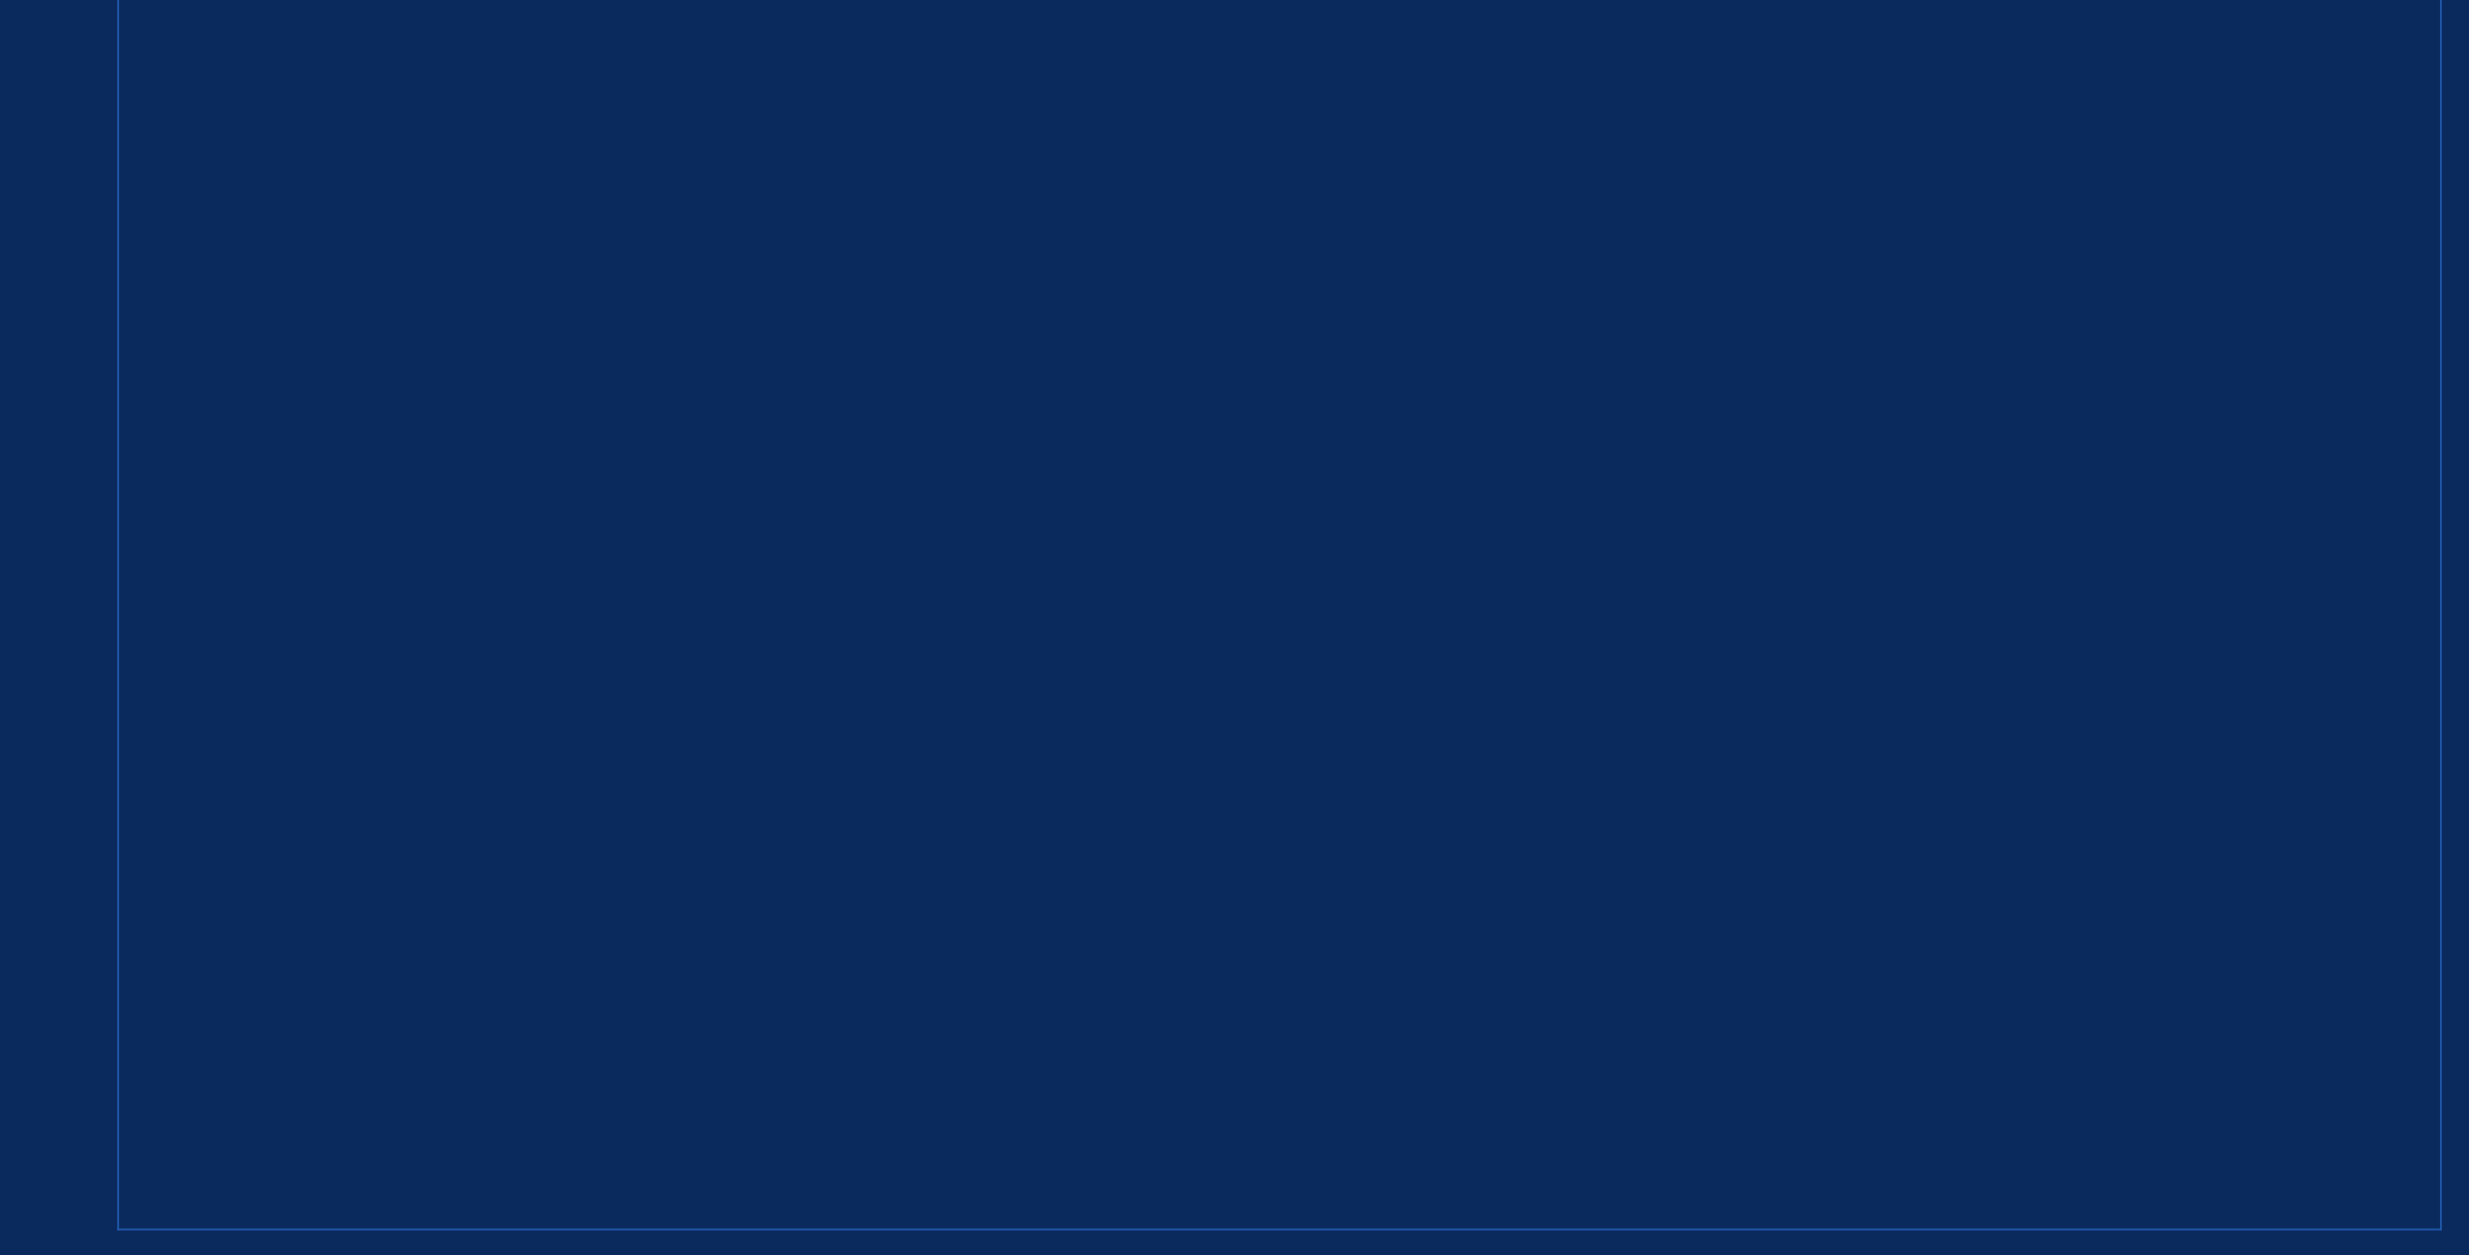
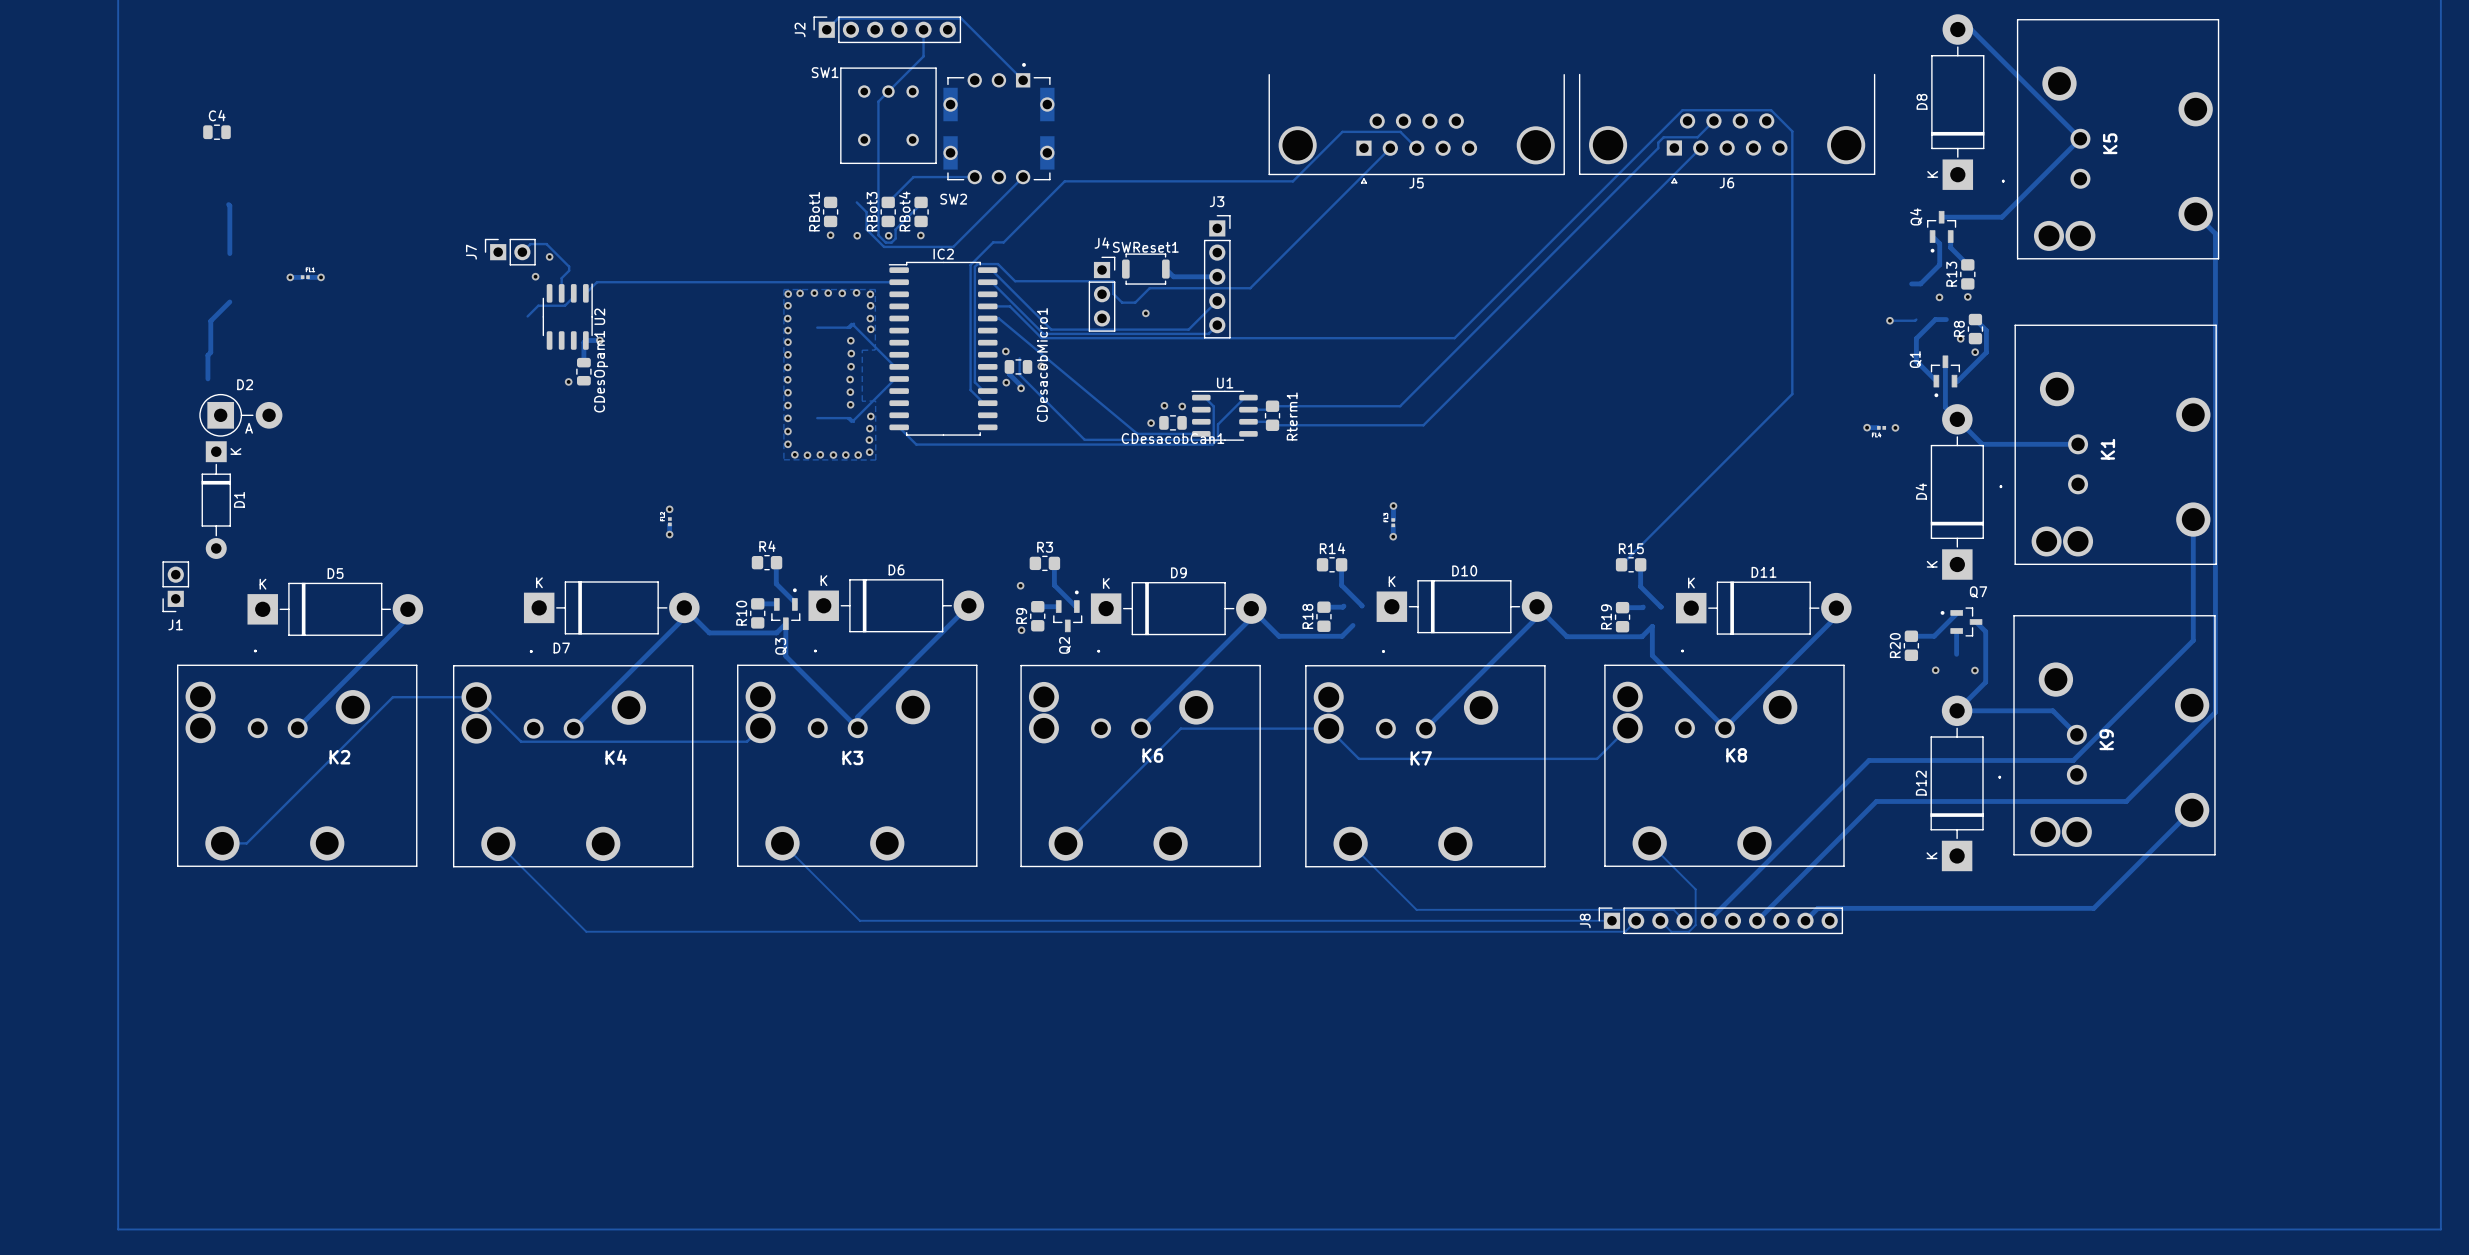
track: none -> (826, 29) (837, 18) (961, 18) (1023, 80)
J2: none -> (887, 29)
track: none -> (923, 29) (923, 56) (878, 101) (878, 235) (885, 242) (891, 242) (895, 238) (895, 229) (921, 202)
track: none -> (1957, 29) (1971, 29) (2080, 138) (2002, 217) (1941, 217)
D8: none -> (1957, 102)
SW1: none -> (888, 115)
track: none -> (1713, 120) (1697, 137) (1663, 137) (1658, 142) (1658, 148) (1400, 406) (1272, 406) (1269, 409) (1248, 409)
SW2: none -> (998, 123)
J5: none -> (1416, 128)
J6: none -> (1727, 128)
C4: none -> (216, 132)
K5: none -> (2110, 139)
track: none -> (1390, 148) (1250, 288) (1149, 288) (1135, 302) (1122, 302) (1113, 293) (1113, 281) (1015, 281) (997, 264) (977, 264) (974, 266) (974, 382) (983, 391) (987, 391)
track: none -> (1416, 148) (1400, 131) (1342, 131) (1292, 181) (1064, 181) (1003, 242) (993, 242) (970, 265) (970, 390) (983, 403) (987, 403)
track: none -> (1700, 148) (1423, 425) (1272, 425) (1269, 421) (1248, 421)
track: none -> (974, 177) (913, 177) (888, 202)
track: none -> (1023, 177) (953, 246) (884, 246) (866, 229) (866, 212) (856, 202)
track: none -> (228, 204) (229, 253)
RBot1: none -> (830, 211)
RBot3: none -> (888, 211)
RBot4: none -> (921, 211)
track: none -> (2195, 214) (2215, 233) (2215, 712) (2126, 801) (1876, 801) (1757, 920)
Q4: none -> (1941, 231)
via: none -> (830, 235)
via: none -> (857, 235)
via: none -> (888, 235)
via: none -> (920, 235)
track: none -> (1932, 236) (1939, 243) (1939, 264) (1920, 283) (1911, 283)
track: none -> (1950, 236) (1950, 247) (1967, 264)
J7: none -> (510, 252)
track: none -> (522, 252) (530, 244) (546, 244) (569, 266) (569, 270) (561, 278) (561, 293)
via: none -> (549, 256)
SWReset1: none -> (1145, 269)
track: none -> (1165, 269) (1173, 276) (1217, 276)
track: none -> (987, 270) (991, 270) (1051, 329) (1188, 329) (1217, 300)
R13: none -> (1967, 274)
via: none -> (535, 276)
J3: none -> (1217, 276)
via: none -> (290, 277)
track: none -> (301, 277) (290, 277)
part: none -> (305, 277)
track: none -> (308, 277) (321, 277)
via: none -> (321, 277)
track: none -> (899, 282) (597, 282) (585, 293)
track: none -> (987, 282) (991, 282) (1043, 333) (1208, 333) (1217, 325)
zone outline: none -> (783, 289) (783, 459) (875, 460) (875, 400) (862, 401) (862, 350) (875, 350) (875, 289) (783, 289)
via: none -> (856, 292)
track: none -> (573, 293) (573, 296) (564, 305) (538, 305) (527, 316)
via: none -> (800, 293)
via: none -> (814, 293)
via: none -> (828, 293)
via: none -> (842, 293)
via: none -> (788, 294)
via: none -> (870, 294)
J4: none -> (1102, 294)
via: none -> (1967, 296)
via: none -> (1939, 297)
track: none -> (229, 301) (210, 321) (210, 352) (207, 355) (207, 378)
via: none -> (787, 305)
via: none -> (870, 305)
track: none -> (987, 306) (1009, 306) (1041, 338) (1454, 338) (1682, 110) (1771, 110) (1792, 131) (1792, 394) (1621, 564)
via: none -> (1145, 313)
U2: none -> (567, 316)
via: none -> (787, 318)
via: none -> (870, 318)
track: none -> (987, 318) (998, 318) (1137, 433) (1201, 433)
track: none -> (1916, 319) (1889, 320)
track: none -> (1946, 319) (1935, 319) (1916, 338) (1916, 361) (1936, 381)
track: none -> (1975, 319) (1986, 330) (1986, 352) (1957, 381) (1954, 381)
via: none -> (1889, 320)
track: none -> (851, 323) (847, 327)
track: none -> (817, 327) (850, 327) (853, 323) (895, 366)
via: none -> (870, 329)
R8: none -> (1975, 329)
via: none -> (787, 330)
via: none -> (1960, 338)
track: none -> (599, 340) (585, 340) (583, 342) (583, 362)
via: none -> (599, 340)
via: none -> (850, 340)
via: none -> (787, 342)
IC2: none -> (943, 348)
via: none -> (1005, 351)
via: none -> (1975, 352)
via: none -> (851, 353)
via: none -> (787, 354)
track: none -> (1019, 358) (1019, 374) (1084, 439) (1211, 439) (1213, 437) (1213, 406) (1204, 397) (1201, 397)
track: none -> (1945, 361) (1945, 407) (1982, 444) (2078, 444)
via: none -> (851, 366)
track: none -> (1009, 366) (1009, 374) (1021, 385) (1021, 388)
CDesacobMicro1: none -> (1018, 366)
via: none -> (1041, 366)
via: none -> (787, 367)
CDesOpam1: none -> (583, 371)
Q1: none -> (1945, 376)
track: none -> (895, 378) (853, 421) (850, 418) (817, 418)
via: none -> (787, 379)
via: none -> (850, 379)
via: none -> (568, 381)
via: none -> (1006, 382)
via: none -> (1021, 388)
via: none -> (787, 392)
via: none -> (850, 392)
track: none -> (1248, 397) (1244, 397) (1218, 424) (1218, 439) (1212, 444) (916, 444) (899, 427)
via: none -> (850, 404)
via: none -> (787, 405)
via: none -> (1164, 405)
via: none -> (1182, 406)
D2: none -> (240, 415)
U1: none -> (1224, 415)
Rterm1: none -> (1272, 415)
via: none -> (870, 416)
via: none -> (787, 418)
track: none -> (847, 418) (851, 421)
CDesacobCan1: none -> (1172, 422)
via: none -> (1151, 423)
track: none -> (1867, 427) (1878, 427)
via: none -> (1867, 427)
part: none -> (1881, 427)
via: none -> (1895, 427)
via: none -> (869, 428)
via: none -> (787, 431)
via: none -> (869, 440)
via: none -> (787, 444)
K1: none -> (2108, 444)
via: none -> (869, 452)
via: none -> (794, 454)
via: none -> (820, 454)
via: none -> (807, 455)
via: none -> (833, 455)
via: none -> (845, 455)
via: none -> (858, 455)
D4: none -> (1957, 491)
D1: none -> (216, 500)
track: none -> (1393, 505) (1393, 519)
via: none -> (1393, 505)
via: none -> (669, 509)
track: none -> (2193, 519) (2193, 640) (2073, 760) (1869, 760) (1708, 920)
part: none -> (669, 521)
part: none -> (1393, 522)
track: none -> (669, 525) (669, 534)
track: none -> (1393, 526) (1393, 536)
via: none -> (669, 534)
via: none -> (1393, 536)
R4: none -> (767, 562)
track: none -> (776, 562) (776, 583) (794, 604)
R3: none -> (1044, 563)
track: none -> (1054, 563) (1054, 585) (1076, 606)
R14: none -> (1332, 564)
track: none -> (1341, 564) (1341, 585) (1362, 606)
R15: none -> (1631, 564)
track: none -> (1640, 564) (1640, 586) (1661, 607)
via: none -> (1020, 585)
J1: none -> (175, 586)
track: none -> (757, 603) (776, 604)
D6: none -> (896, 605)
track: none -> (968, 605) (857, 716) (857, 728) (785, 656) (785, 623) (776, 632) (709, 632) (684, 607) (684, 617) (573, 728)
track: none -> (1058, 606) (1037, 606)
track: none -> (1343, 606) (1323, 607)
D10: none -> (1464, 606)
D7: none -> (611, 607)
track: none -> (1643, 607) (1622, 607)
D9: none -> (1178, 608)
D11: none -> (1763, 608)
track: none -> (1836, 608) (1836, 616) (1724, 728) (1652, 655) (1652, 626) (1641, 636) (1567, 636) (1537, 606) (1537, 617) (1425, 728)
D5: none -> (335, 609)
track: none -> (407, 609) (407, 617) (297, 728)
Q3: none -> (785, 609)
Q2: none -> (1067, 611)
track: none -> (1956, 612) (1934, 636) (1911, 636)
R10: none -> (757, 613)
R9: none -> (1037, 616)
R18: none -> (1323, 616)
R19: none -> (1622, 617)
Q7: none -> (1961, 621)
track: none -> (1976, 621) (1985, 631) (1985, 682) (1957, 710) (2052, 710) (2076, 734)
track: none -> (1353, 625) (1342, 636) (1278, 636) (1251, 608) (1251, 618) (1141, 728)
via: none -> (1021, 630)
track: none -> (1956, 631) (1956, 654)
R20: none -> (1911, 645)
via: none -> (1935, 670)
via: none -> (1974, 670)
track: none -> (760, 728) (747, 741) (521, 741) (476, 697) (392, 697) (246, 843) (222, 843)
track: none -> (1627, 728) (1597, 758) (1358, 758) (1328, 728) (1180, 728) (1065, 843)
K9: none -> (2106, 735)
K2: none -> (297, 758)
K4: none -> (573, 758)
K3: none -> (857, 758)
K6: none -> (1140, 758)
K7: none -> (1425, 758)
K8: none -> (1724, 758)
D12: none -> (1957, 783)
track: none -> (2192, 810) (2093, 908) (1817, 908) (1805, 920)
track: none -> (498, 843) (586, 931) (1625, 931) (1636, 920)
track: none -> (782, 843) (859, 920) (1611, 920)
track: none -> (1350, 843) (1416, 909) (1673, 909) (1684, 920)
track: none -> (1649, 843) (1695, 889) (1695, 925) (1689, 931) (1671, 931) (1660, 920)
J8: none -> (1720, 920)

